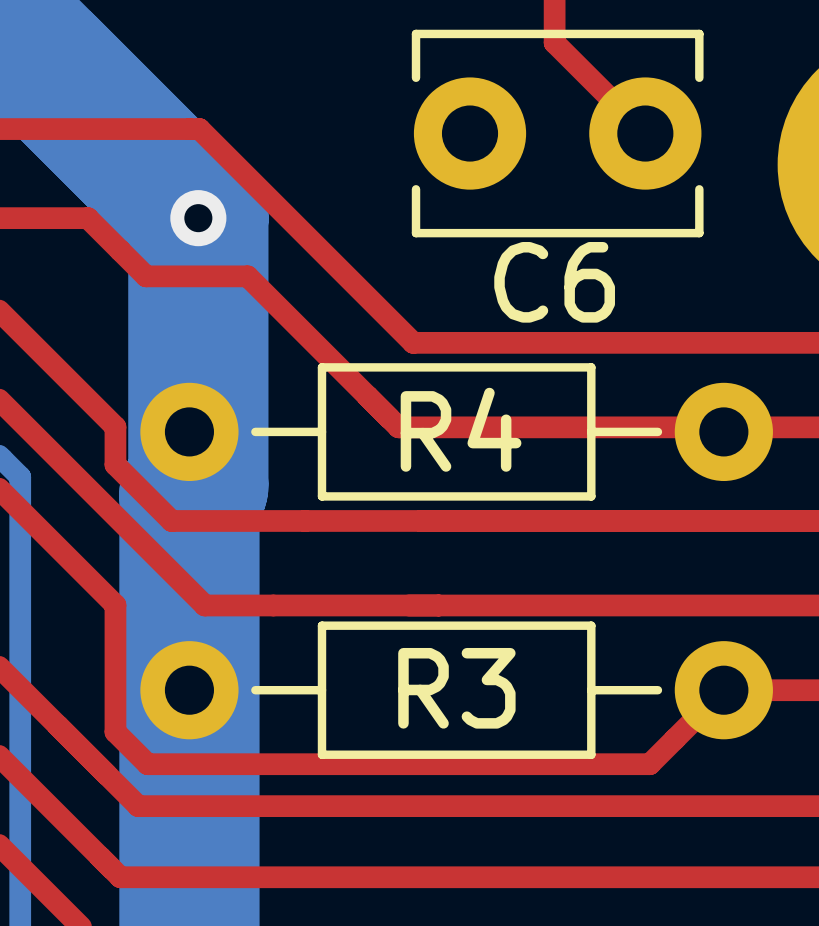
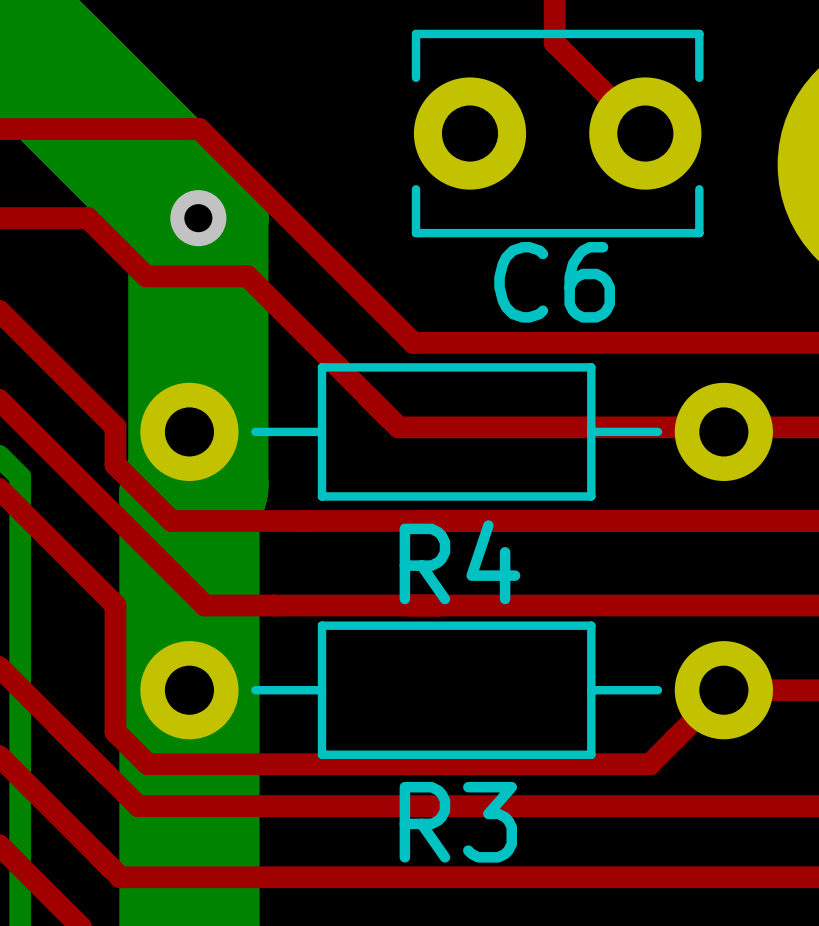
R4 name position: R4 (461, 429) -> R4 (459, 562)
R3 name position: R3 (456, 688) -> R3 (458, 822)

